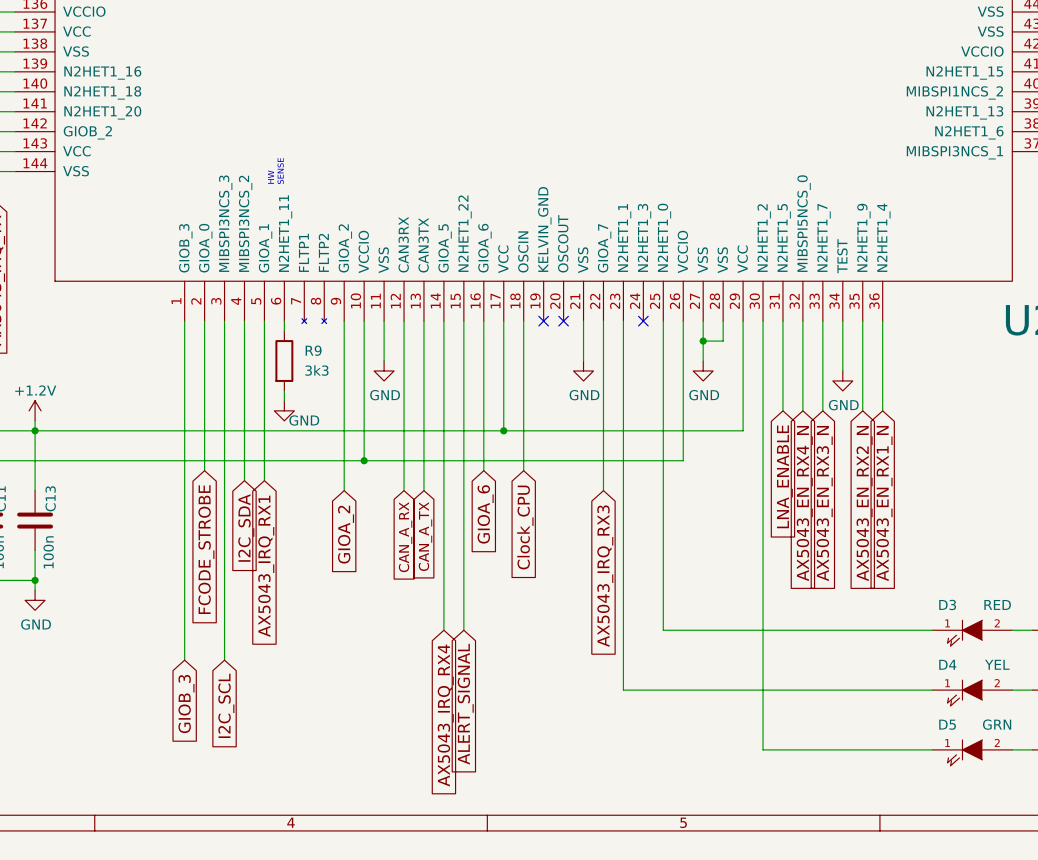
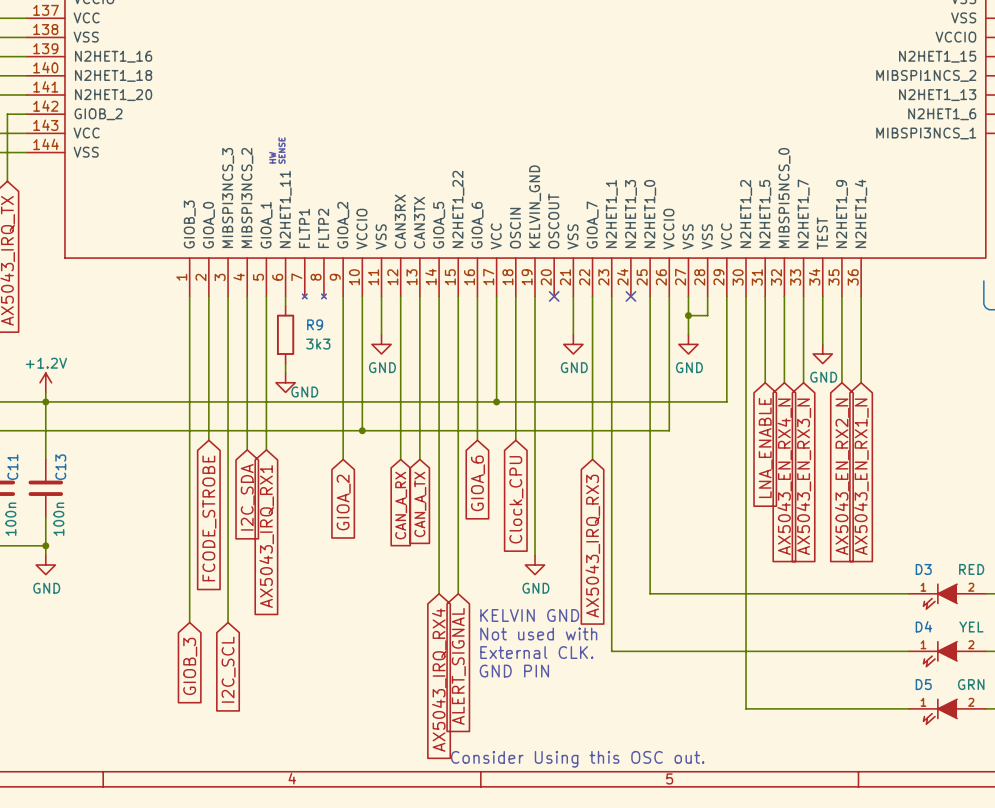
wire: none -> (534, 296) (534, 555)
no-connect mark: (543, 321) -> none
power symbol: none -> GND (534, 565)
text: none -> KELVIN GND (529, 615)
text: none -> Not used with (538, 634)
text: none -> External CLK. (536, 652)
text: none -> GND PIN (514, 671)
text: none -> Consider Using this OSC out. (577, 759)

